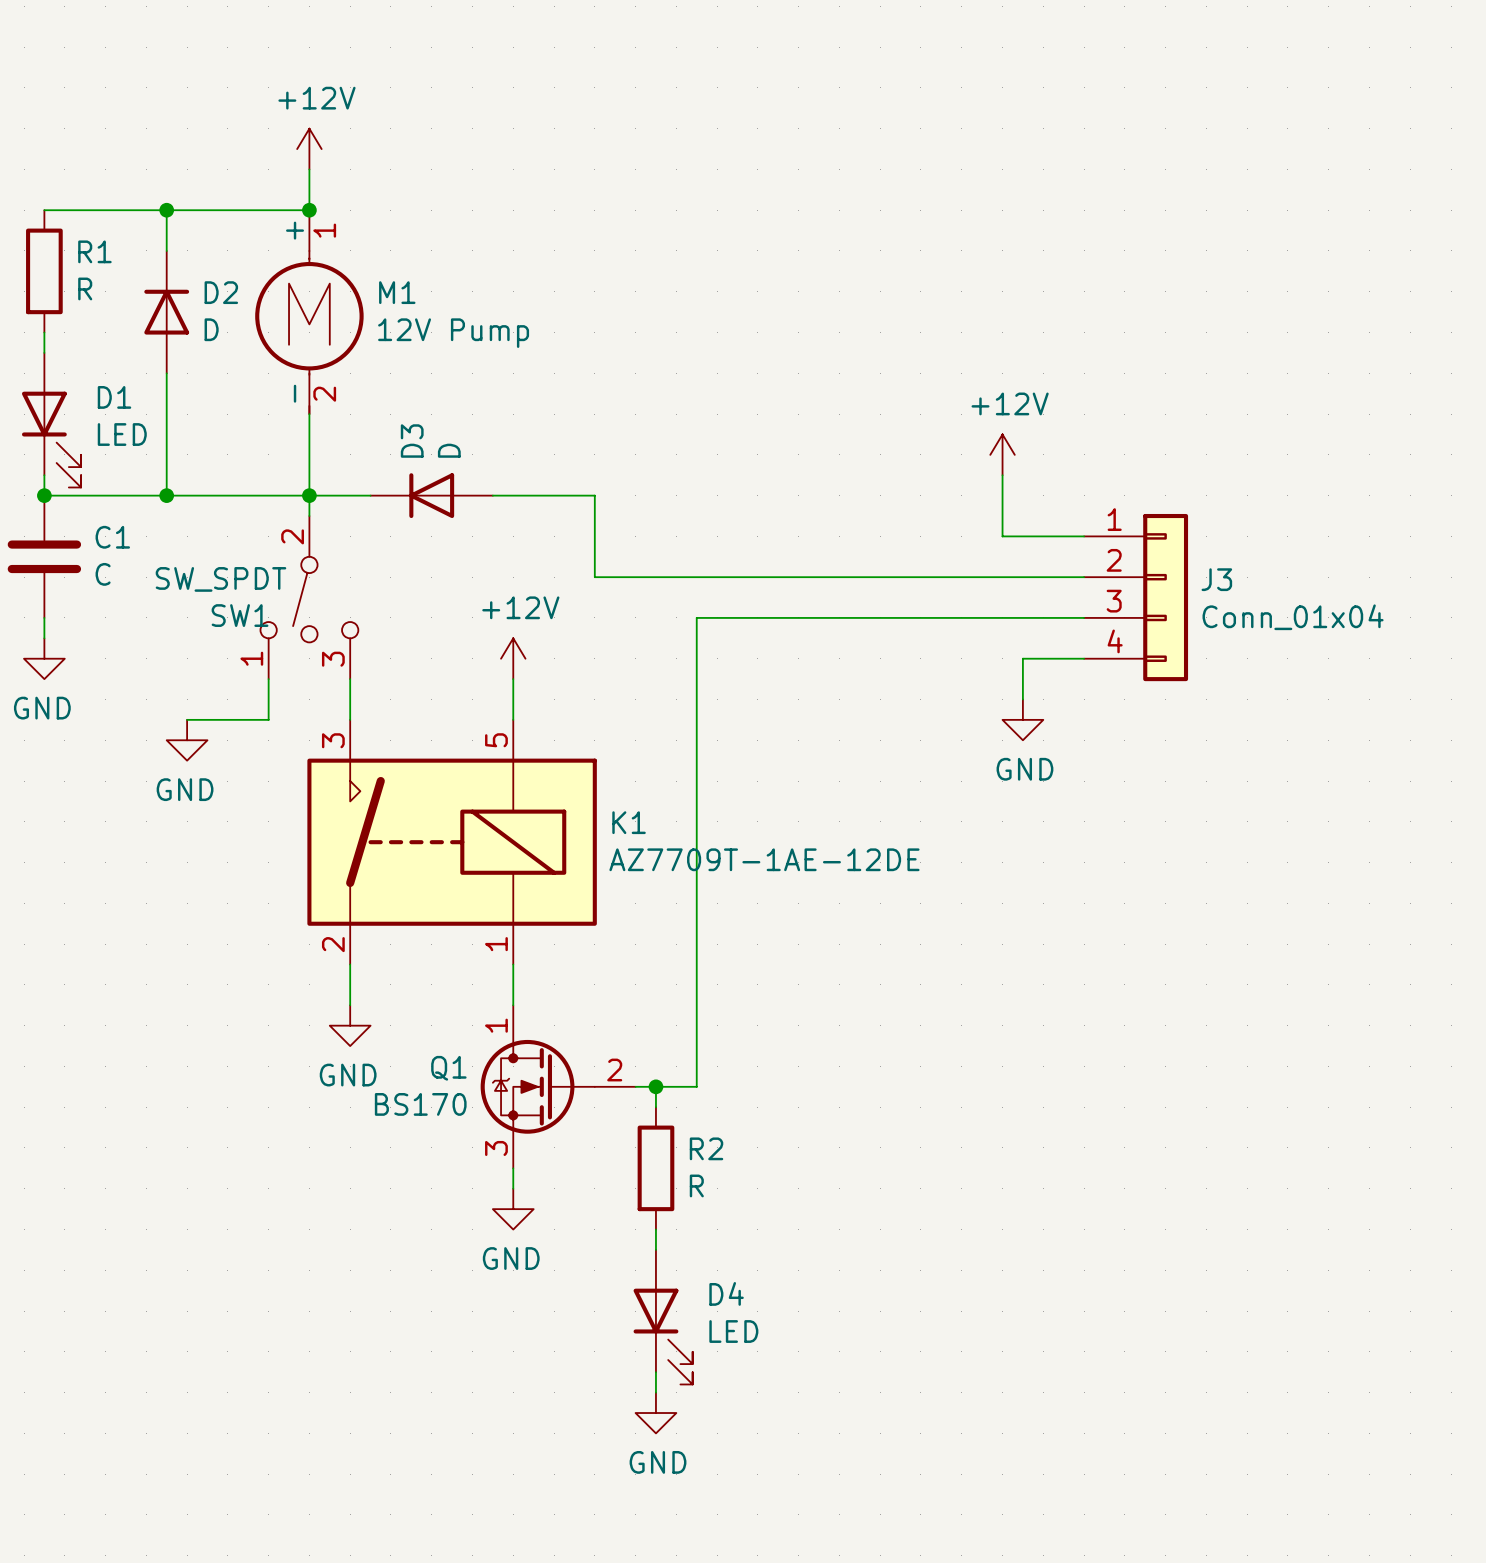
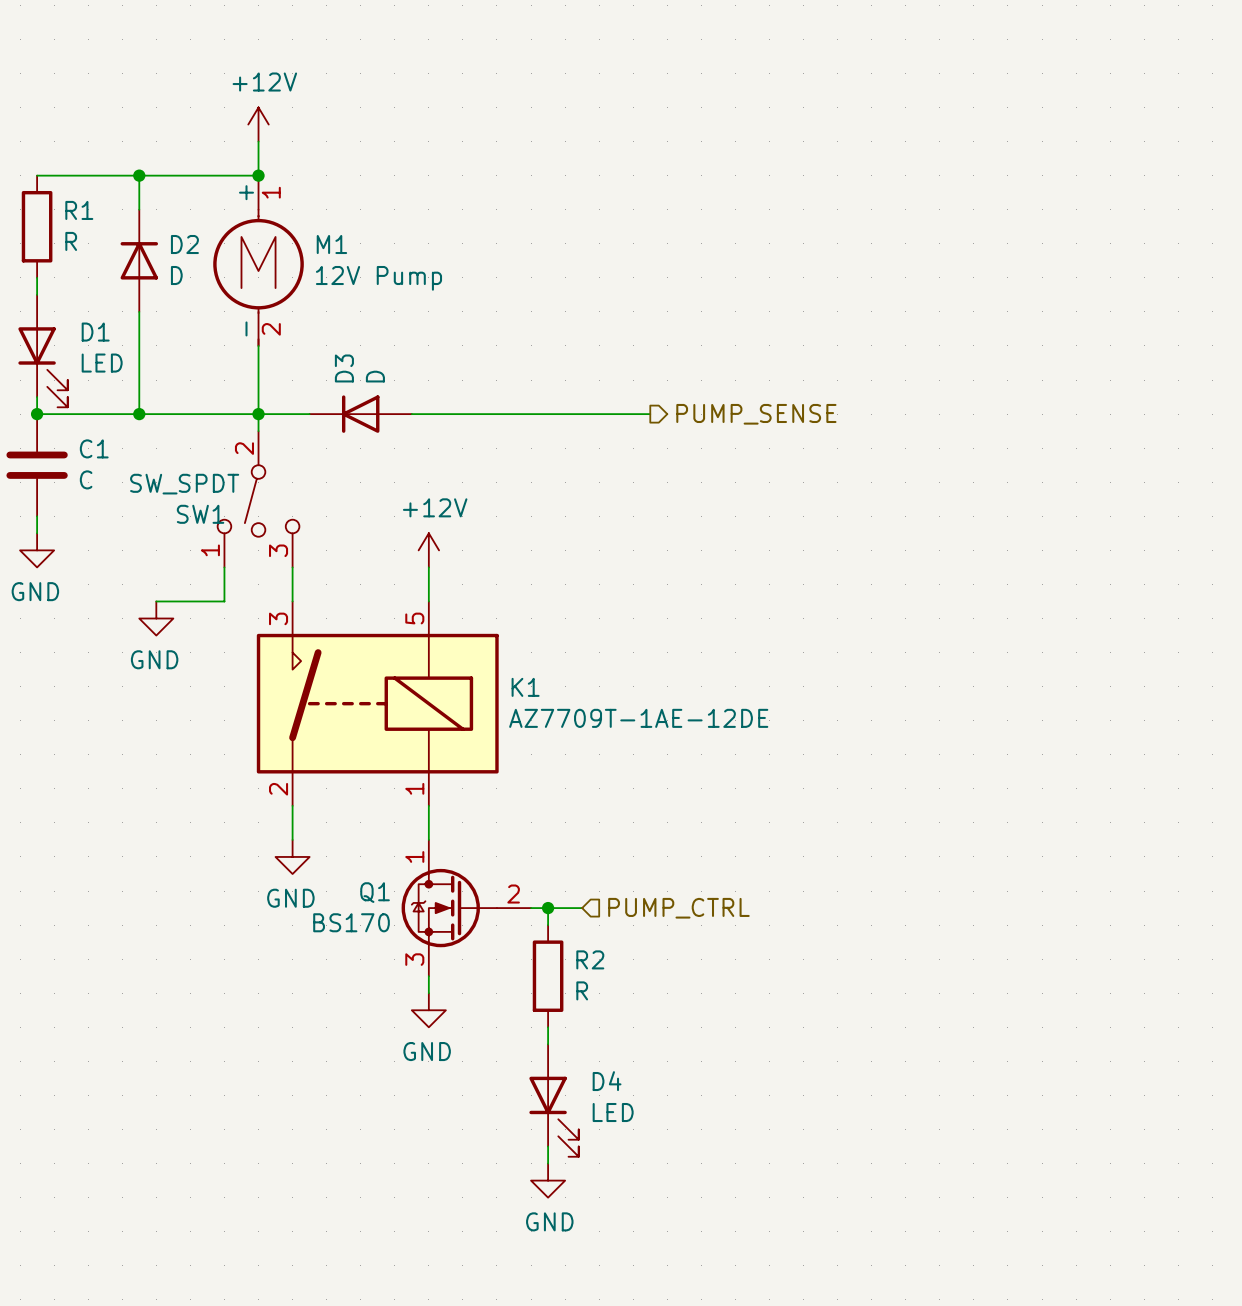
power symbol: +12V (1002, 454) -> none
wire: (1002, 475) (1002, 536) (1084, 536) -> none
wire: (594, 495) (594, 577) (1084, 577) -> (496, 414) (650, 414)
hierarchical label: none -> PUMP_SENSE (756, 414)
J3: Conn_01x04 (1136, 597) -> none
wire: (1084, 617) (696, 617) (696, 1086) -> none
wire: (1084, 658) (1022, 658) (1022, 699) -> none
power symbol: GND (1022, 719) -> none
hierarchical label: none -> PUMP_CTRL (678, 908)

